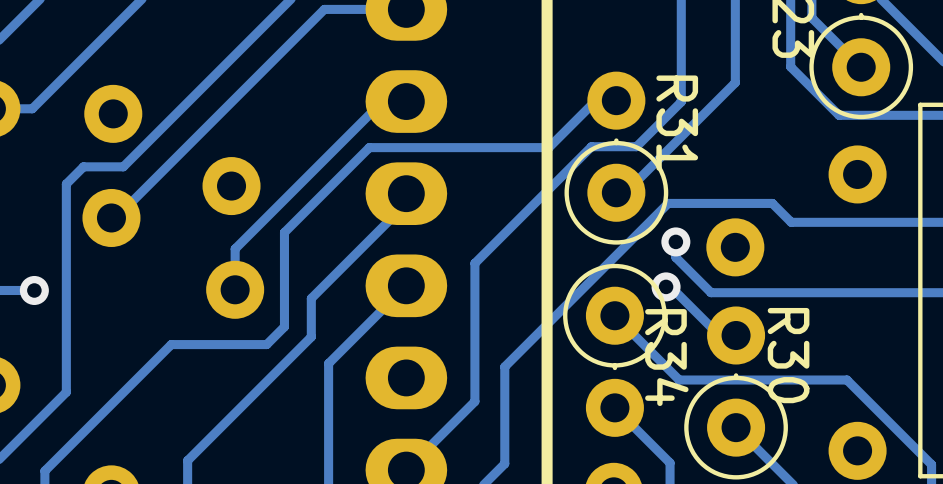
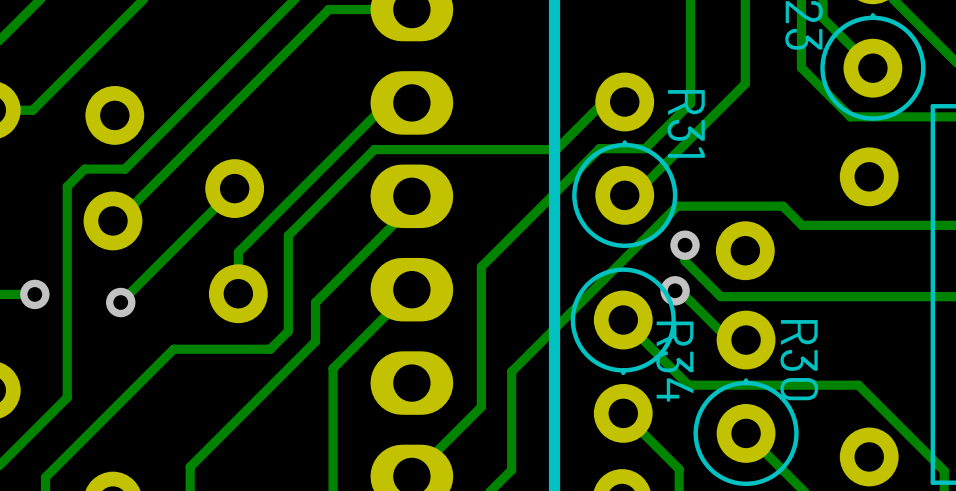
track: none -> (234, 188) (120, 302)
via: none -> (120, 302)

